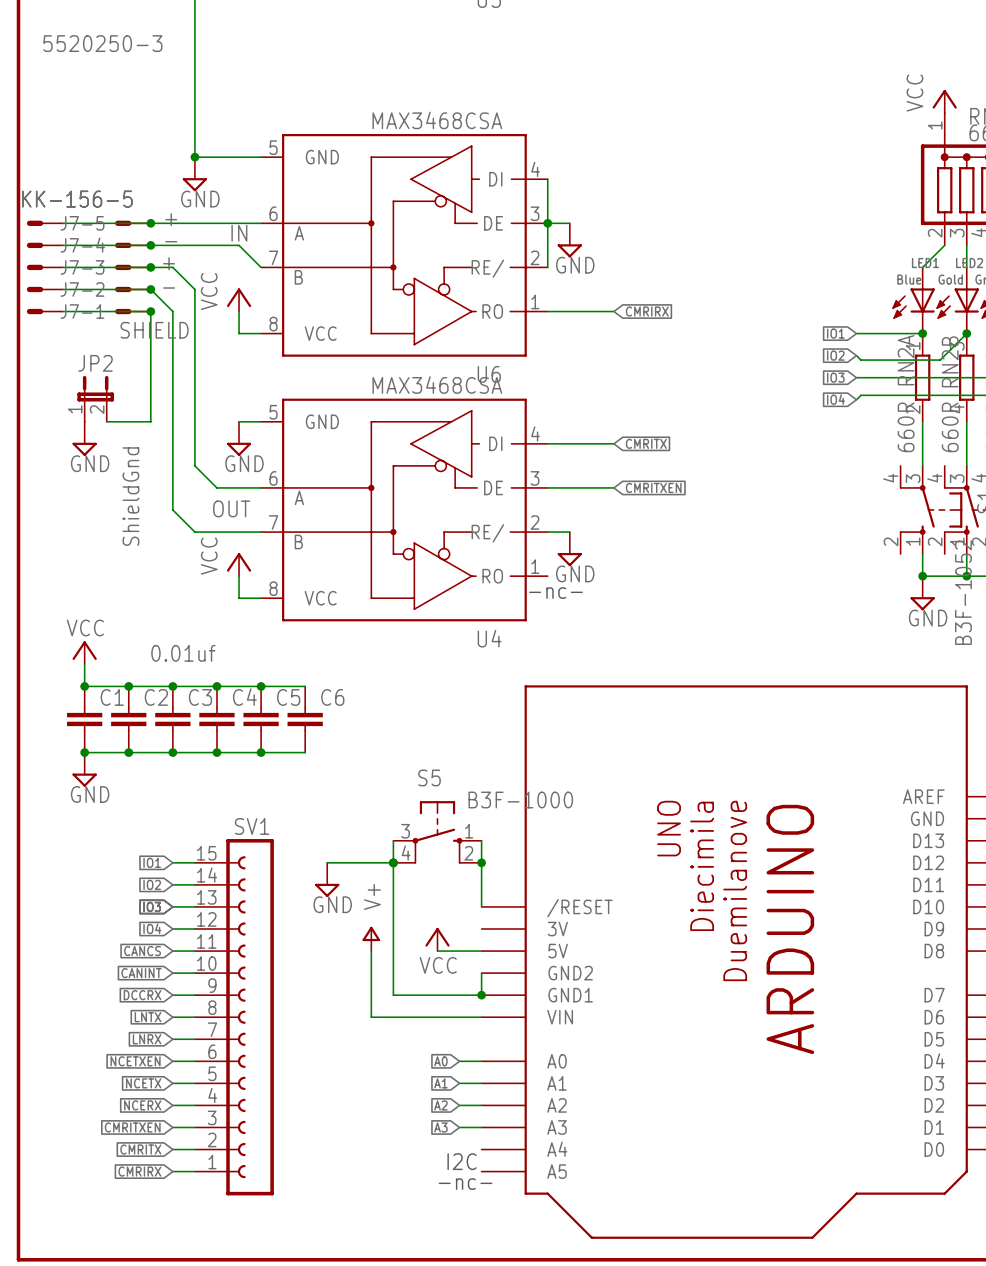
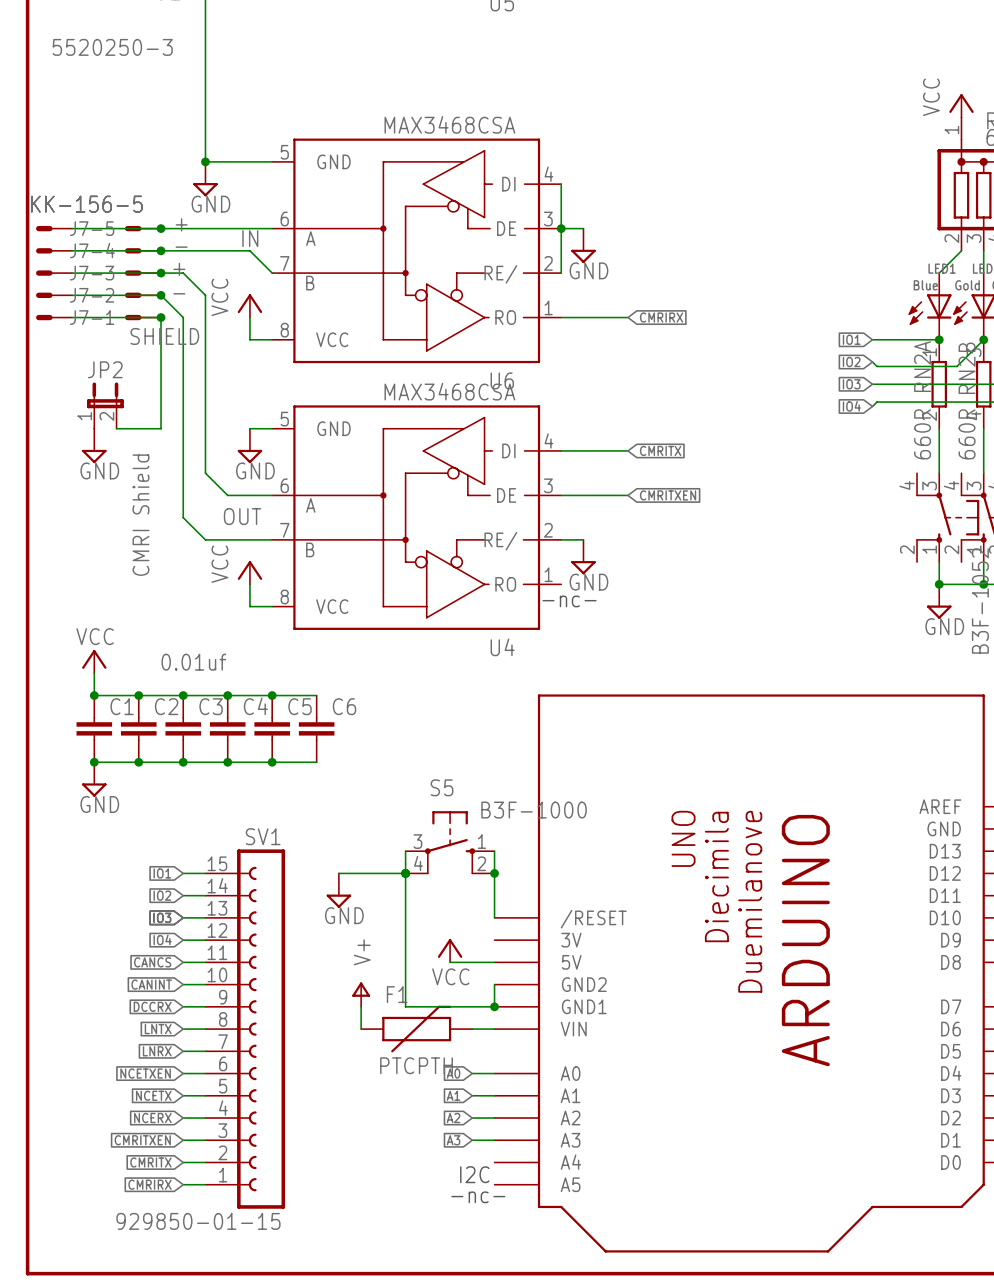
JP2 value: ShieldGnd (130, 496) -> CMRI Shield (141, 515)
power symbol position: V+ (371, 938) -> V+ (361, 994)
wire: (371, 951) (371, 1017) (459, 1017) -> none
wire: none -> (361, 1006) (361, 1029)
F1: none -> PTCPTH (416, 1029)
SV1 value: none -> 929850-01-15 (198, 1221)

